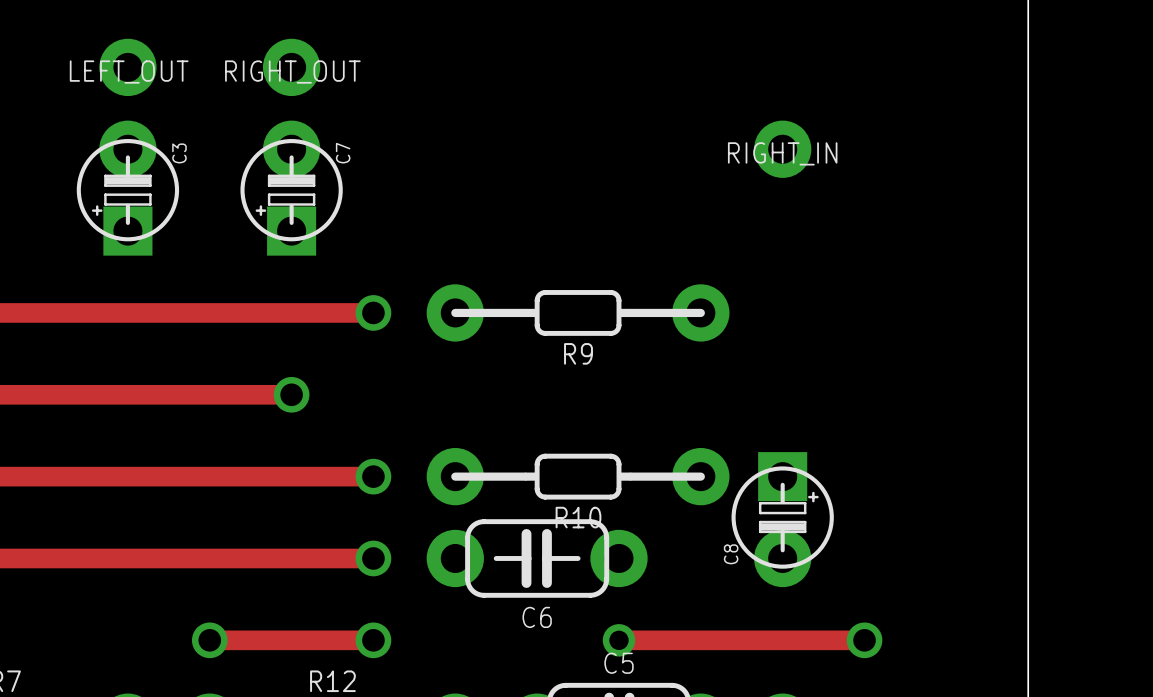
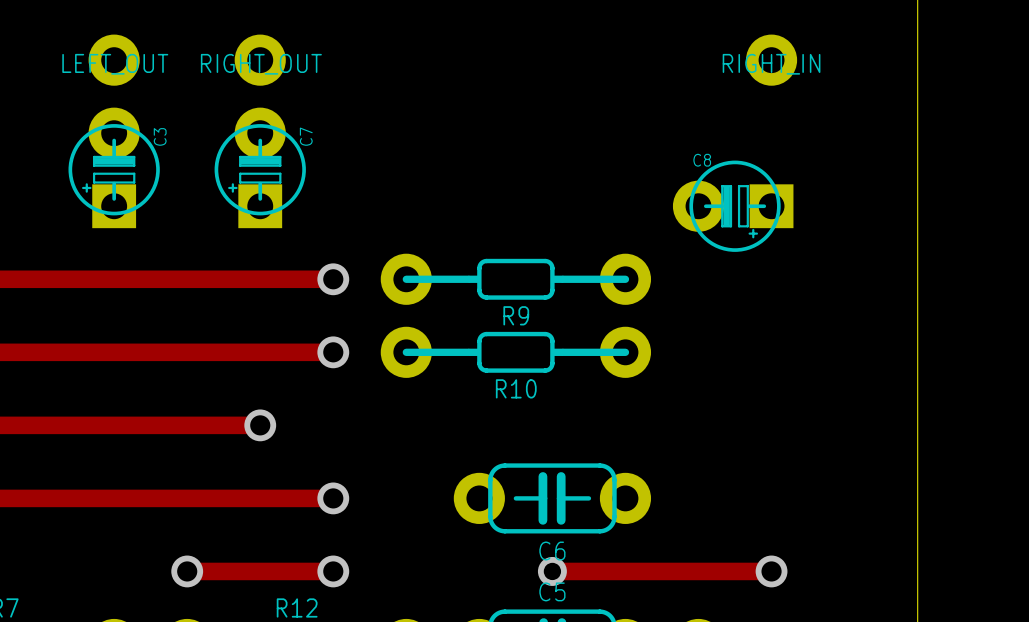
RIGHT_IN position: (782, 149) -> (771, 60)
via: (291, 394) -> none
via: none -> (333, 352)
track: (291, 476) (373, 476) -> (260, 352) (333, 352)
via: none -> (260, 425)
via: (373, 476) -> none
R10 position: (578, 476) -> (515, 352)
C8 rotation: 0° (782, 519) -> 90° clockwise (733, 206)
C8 position: (782, 519) -> (733, 206)
C6 position: (537, 558) -> (552, 498)

